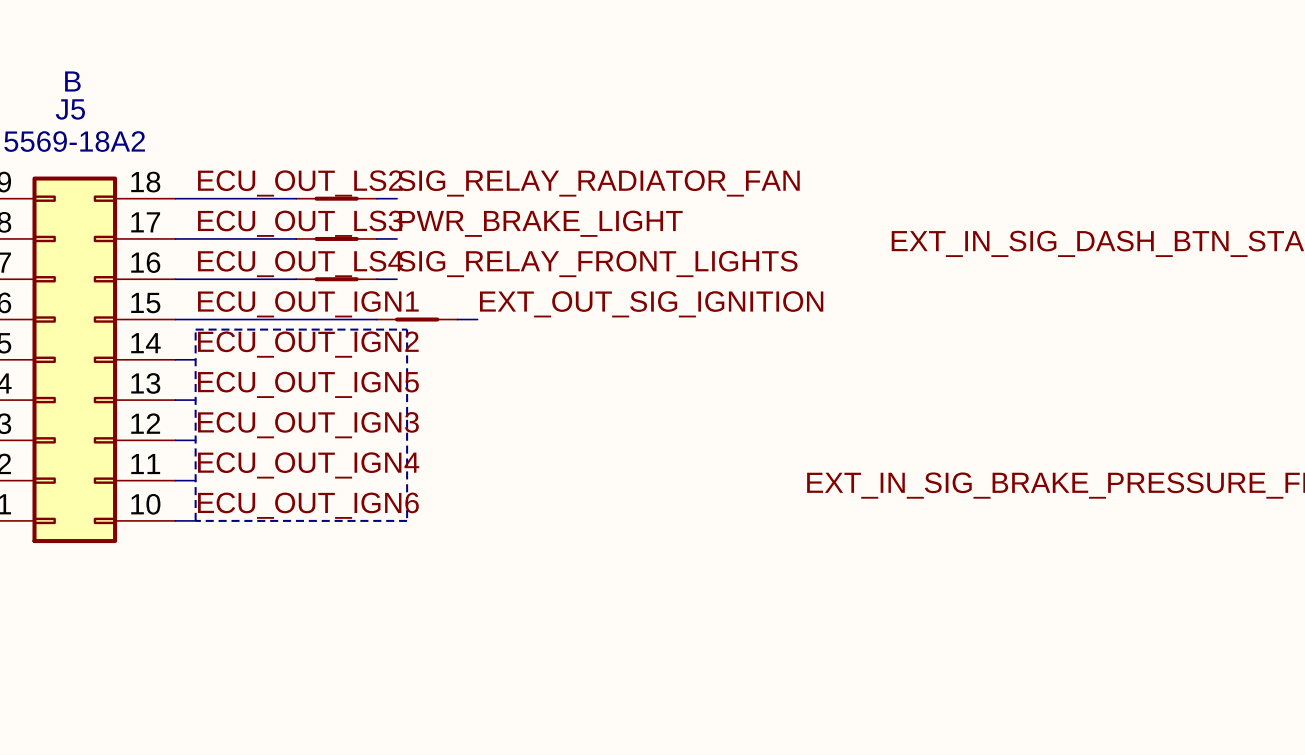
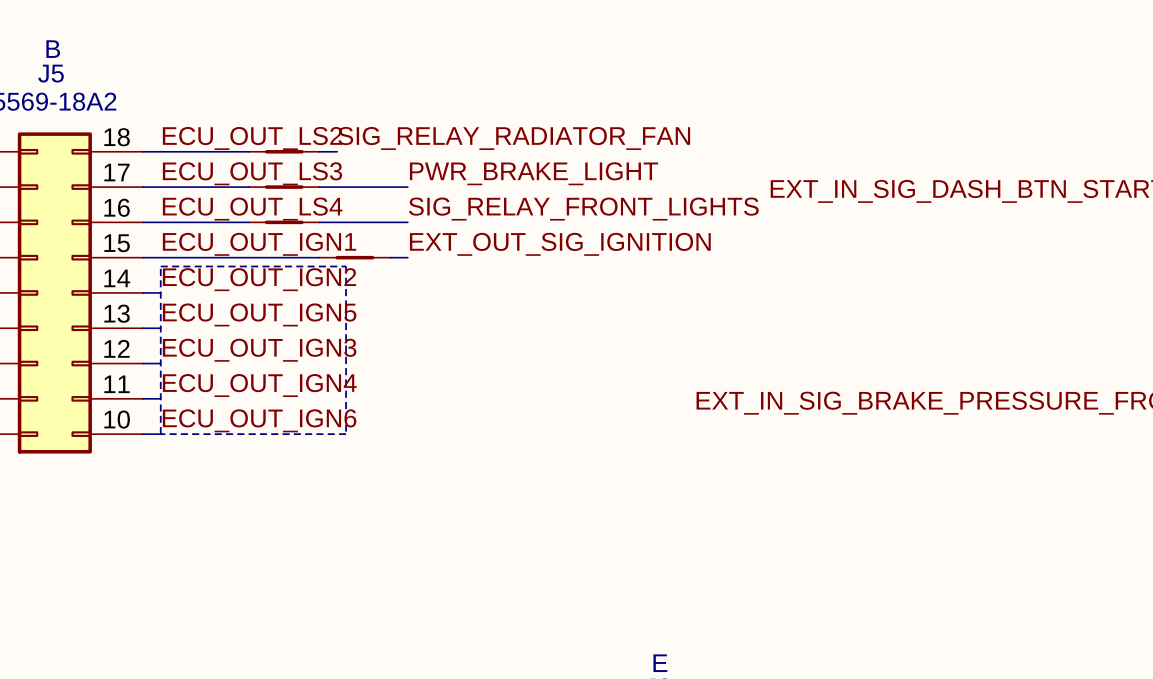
label position: PWR_BRAKE_LIGHT (541, 223) -> PWR_BRAKE_LIGHT (534, 173)
wire: none -> (337, 187) (407, 187)
label position: SIG_RELAY_FRONT_LIGHTS (597, 264) -> SIG_RELAY_FRONT_LIGHTS (583, 209)
wire: none -> (337, 222) (407, 222)

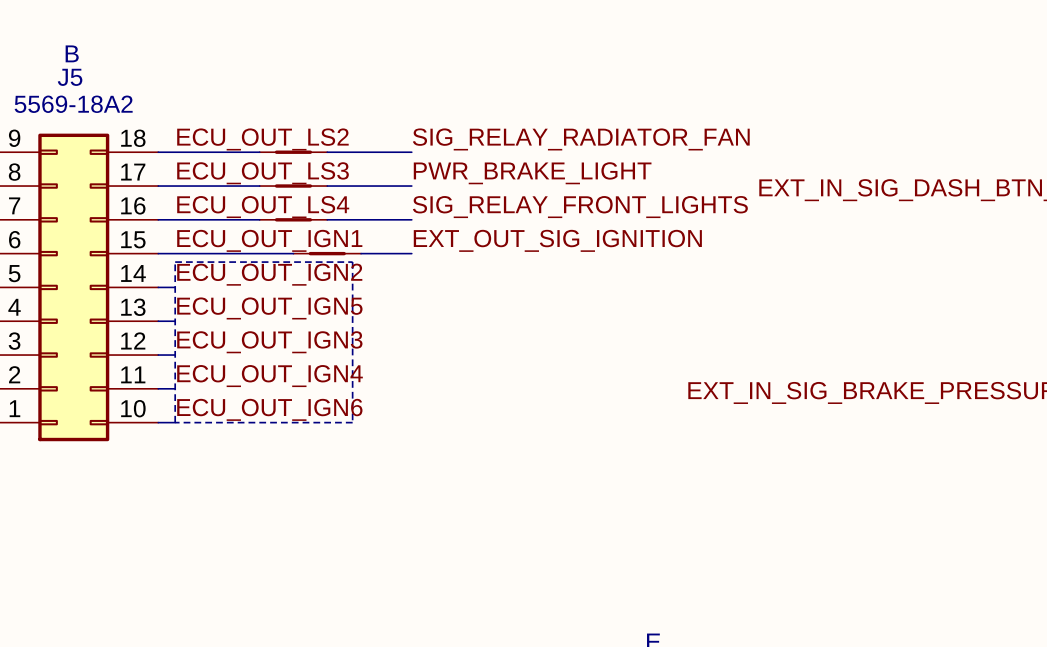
label position: SIG_RELAY_RADIATOR_FAN (514, 138) -> SIG_RELAY_RADIATOR_FAN (581, 139)
wire: none -> (344, 152) (411, 152)
part position: (354, 257) -> (327, 253)

